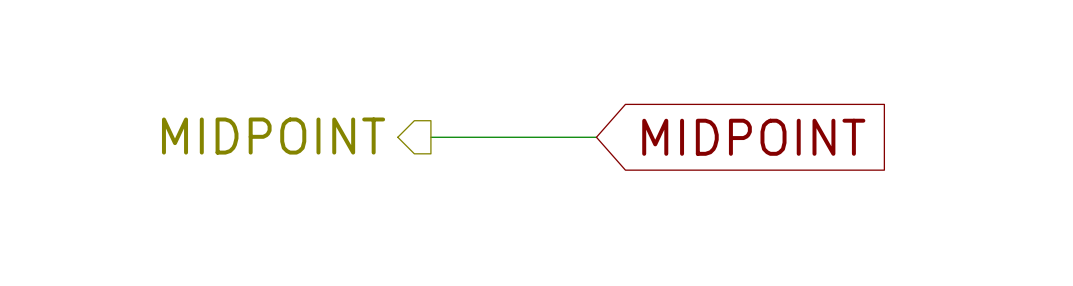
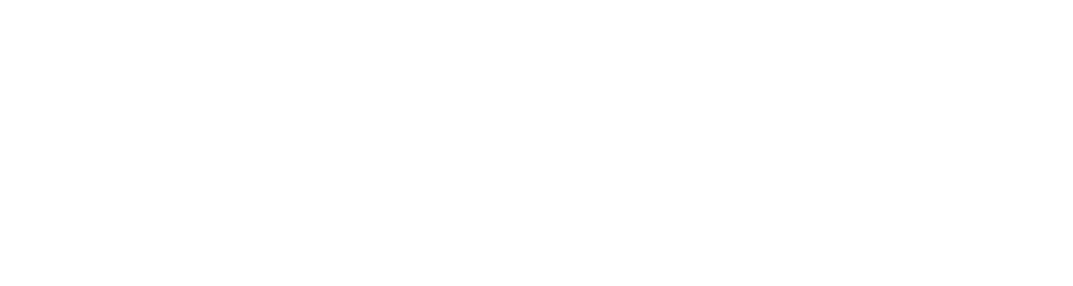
hierarchical label: MIDPOINT (273, 136) -> none
wire: (430, 137) (596, 137) -> none
global label: MIDPOINT (753, 137) -> none

